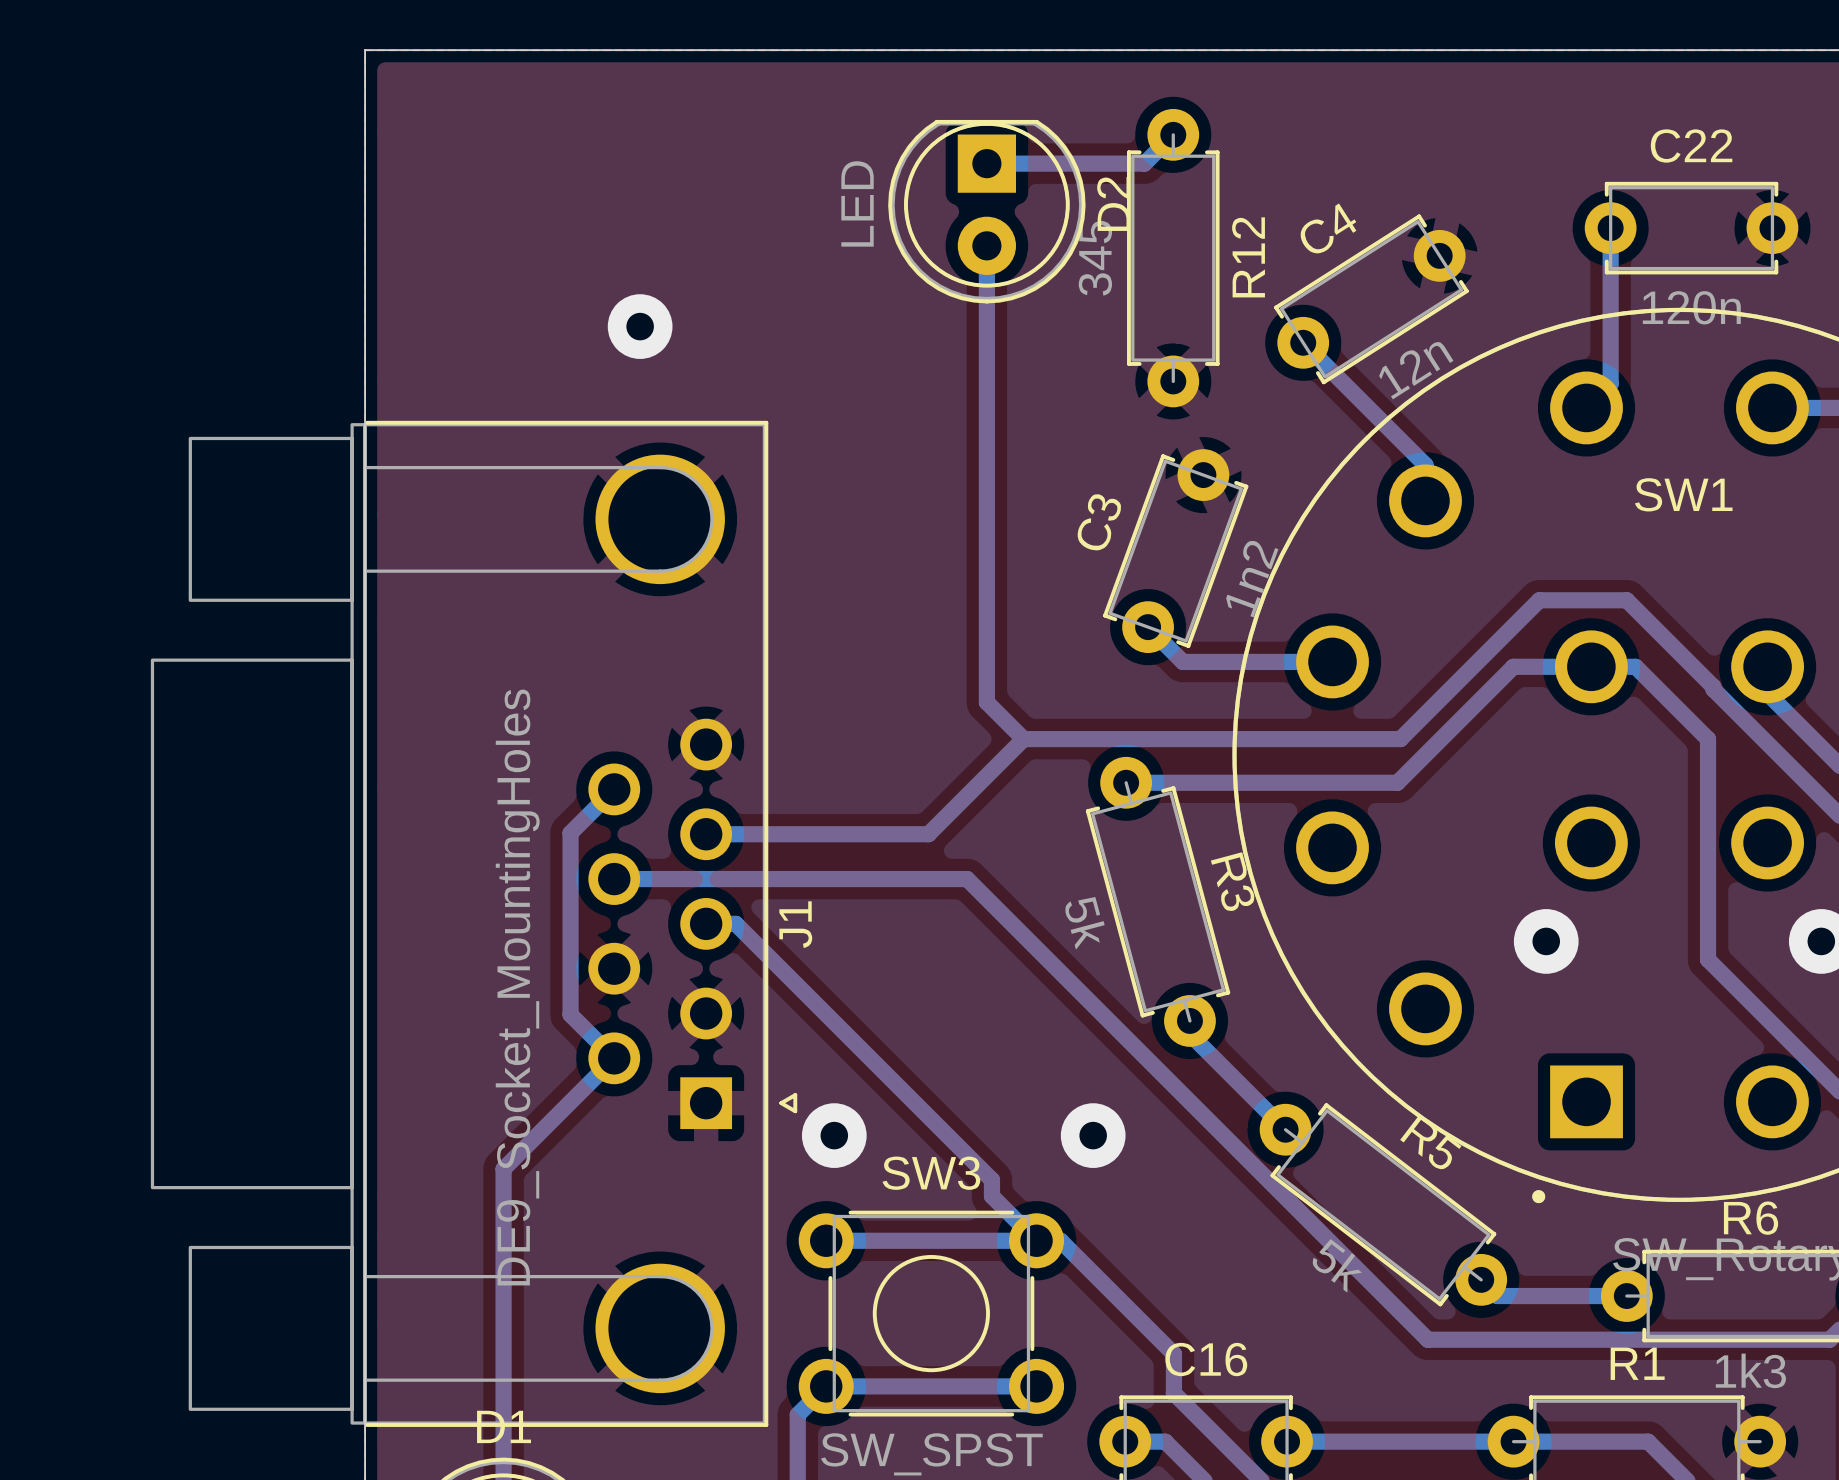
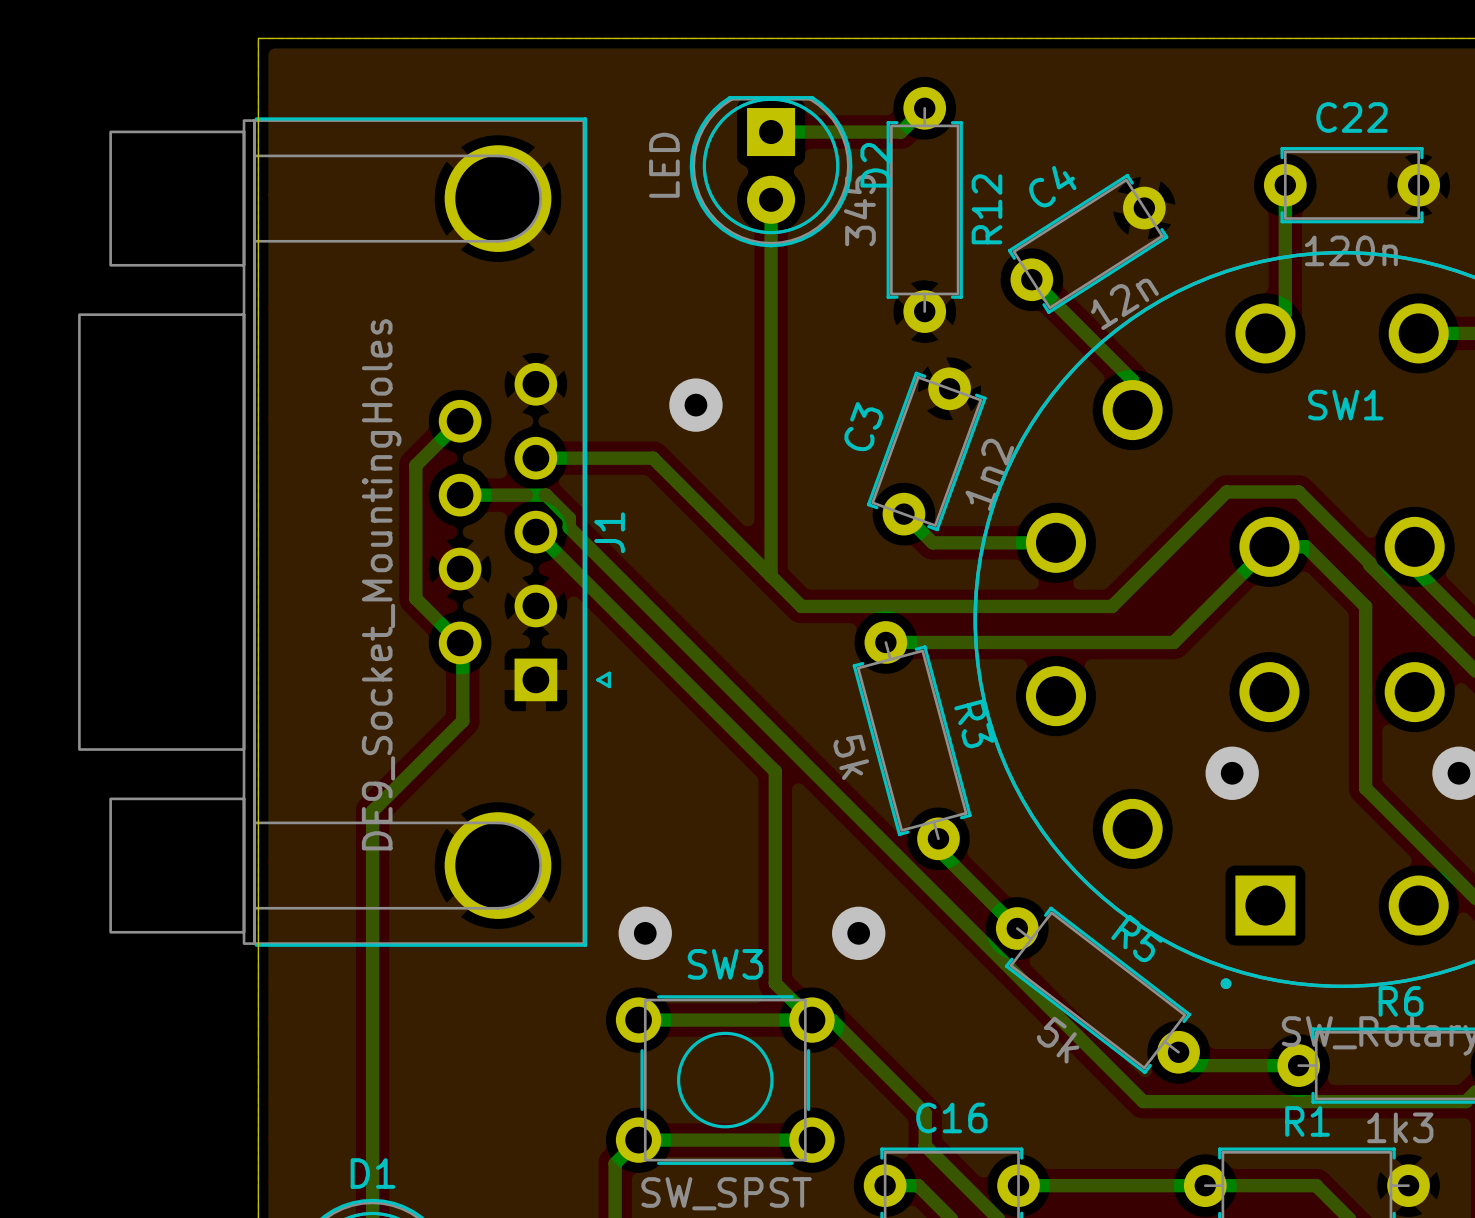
via: (640, 326) -> none
via: none -> (695, 405)
bottom track: none -> (535, 458) (653, 458) (771, 576)
bottom track: (1591, 666) (1513, 666) (1397, 782) -> (1269, 546) (1173, 642) (1109, 642)
bottom track: (1023, 739) (928, 834) (706, 834) -> none
bottom track: (614, 789) (570, 833) (570, 1014) (614, 1058) (503, 1169) -> (460, 421) (415, 465) (415, 598) (460, 642) (462, 648) (462, 720) (372, 811) (372, 960)
bottom track: (614, 879) (967, 879) (1427, 1339) (1438, 1339) -> (460, 495) (546, 495) (569, 518) (569, 527) (1143, 1101)
J1 position: (474, 923) -> (344, 532)
bottom track: (706, 923) (735, 923) (991, 1180) -> (535, 532) (775, 771) (775, 969)

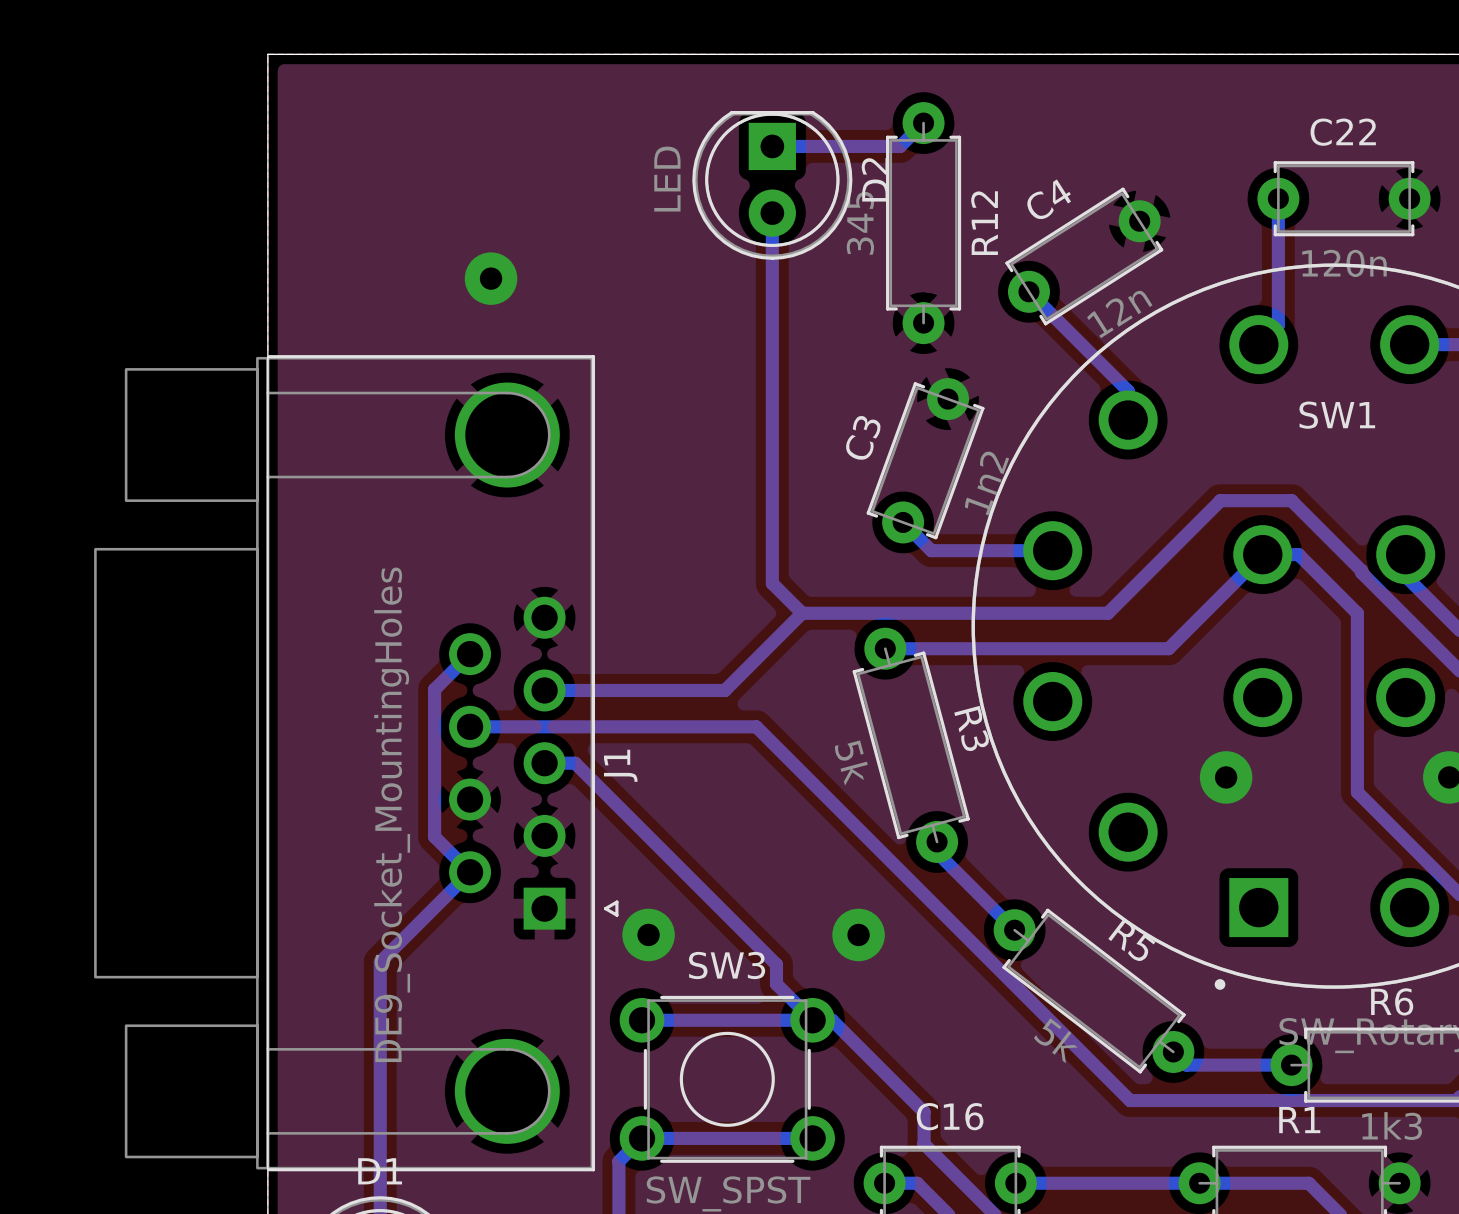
via: none -> (491, 278)
via: (695, 405) -> none
bottom track: (460, 421) (415, 465) (415, 598) (460, 642) (462, 648) (462, 720) (372, 811) (372, 960) -> (470, 654) (434, 689) (434, 836) (470, 872) (380, 962)
bottom track: (535, 458) (653, 458) (771, 576) -> none
bottom track: (460, 495) (546, 495) (569, 518) (569, 527) (1143, 1101) -> (470, 726) (756, 726) (1130, 1100) (1138, 1100)
J1 position: (344, 532) -> (356, 763)
bottom track: (535, 532) (775, 771) (775, 963) -> (544, 763) (575, 763) (776, 964)
bottom track: none -> (802, 613) (724, 690) (544, 690)

